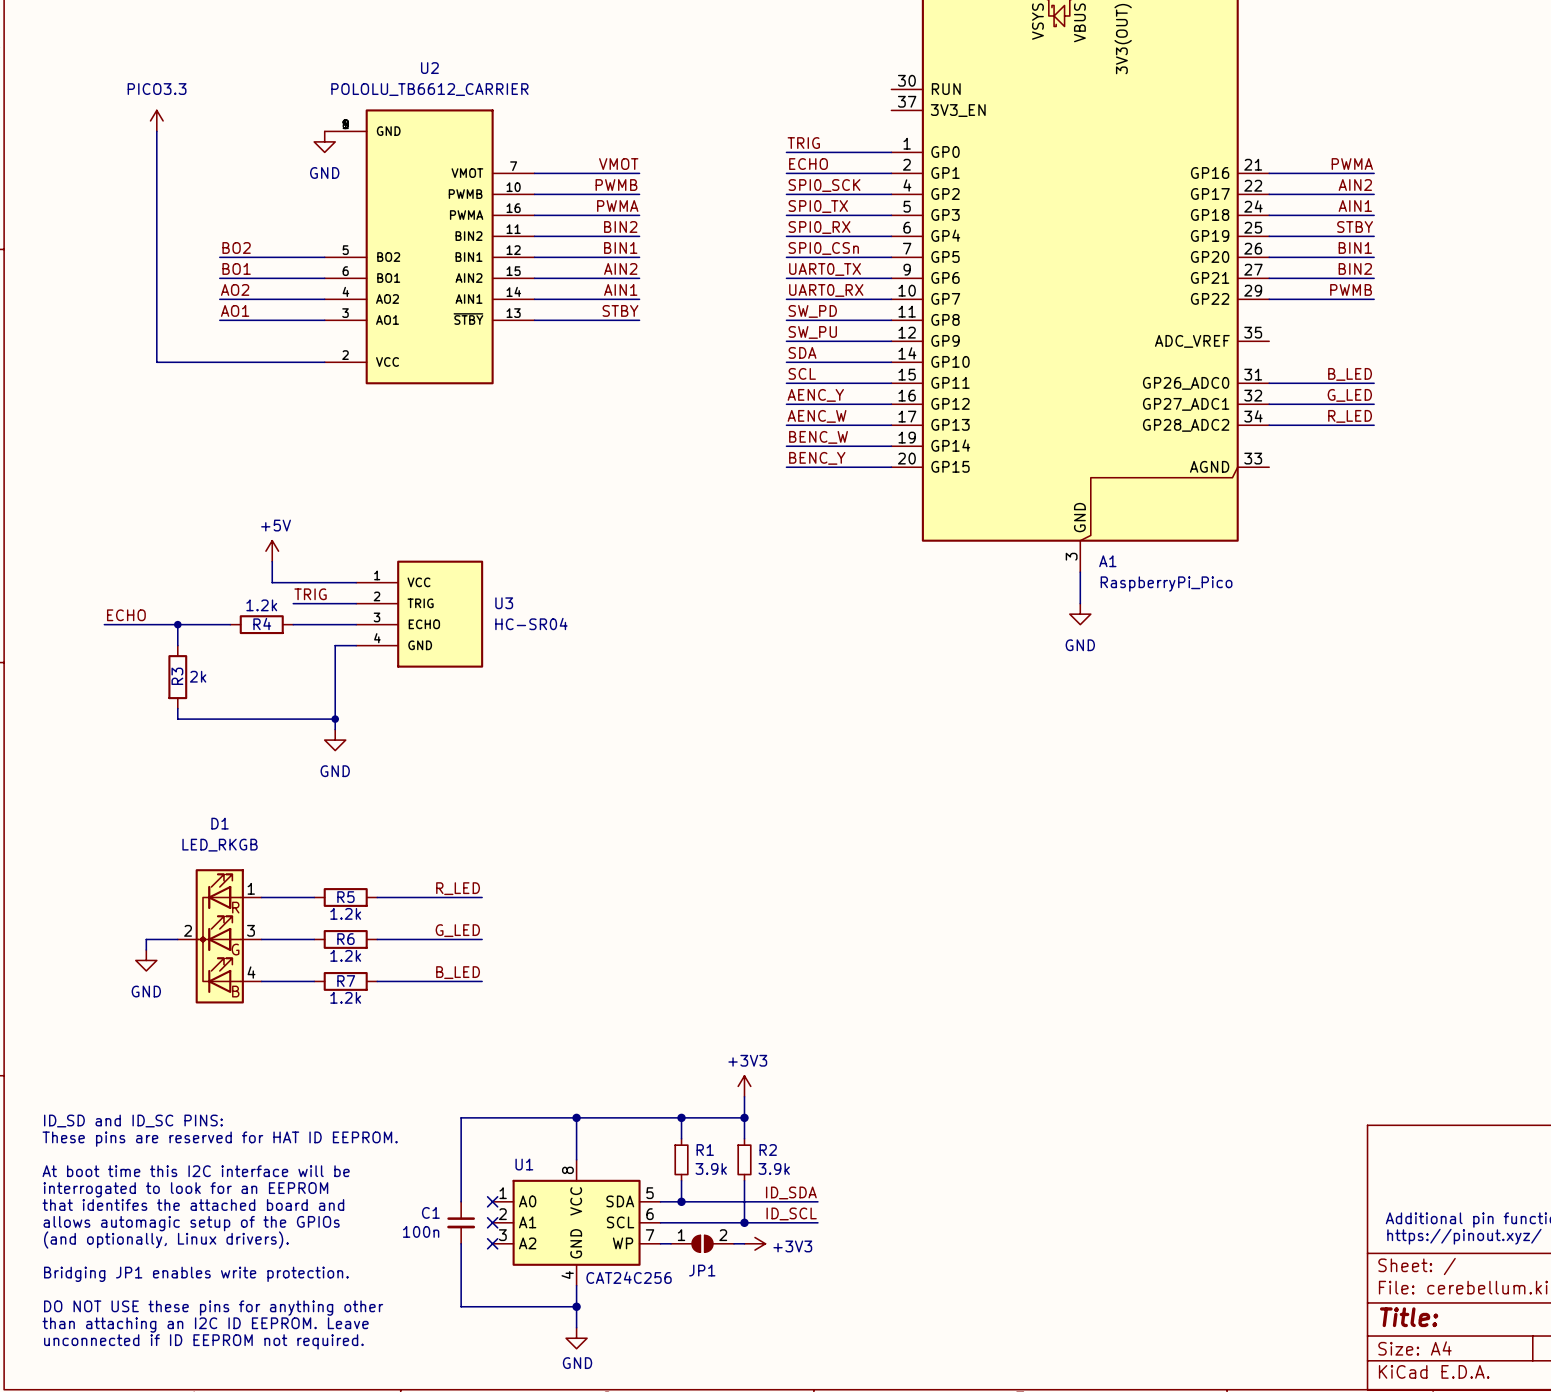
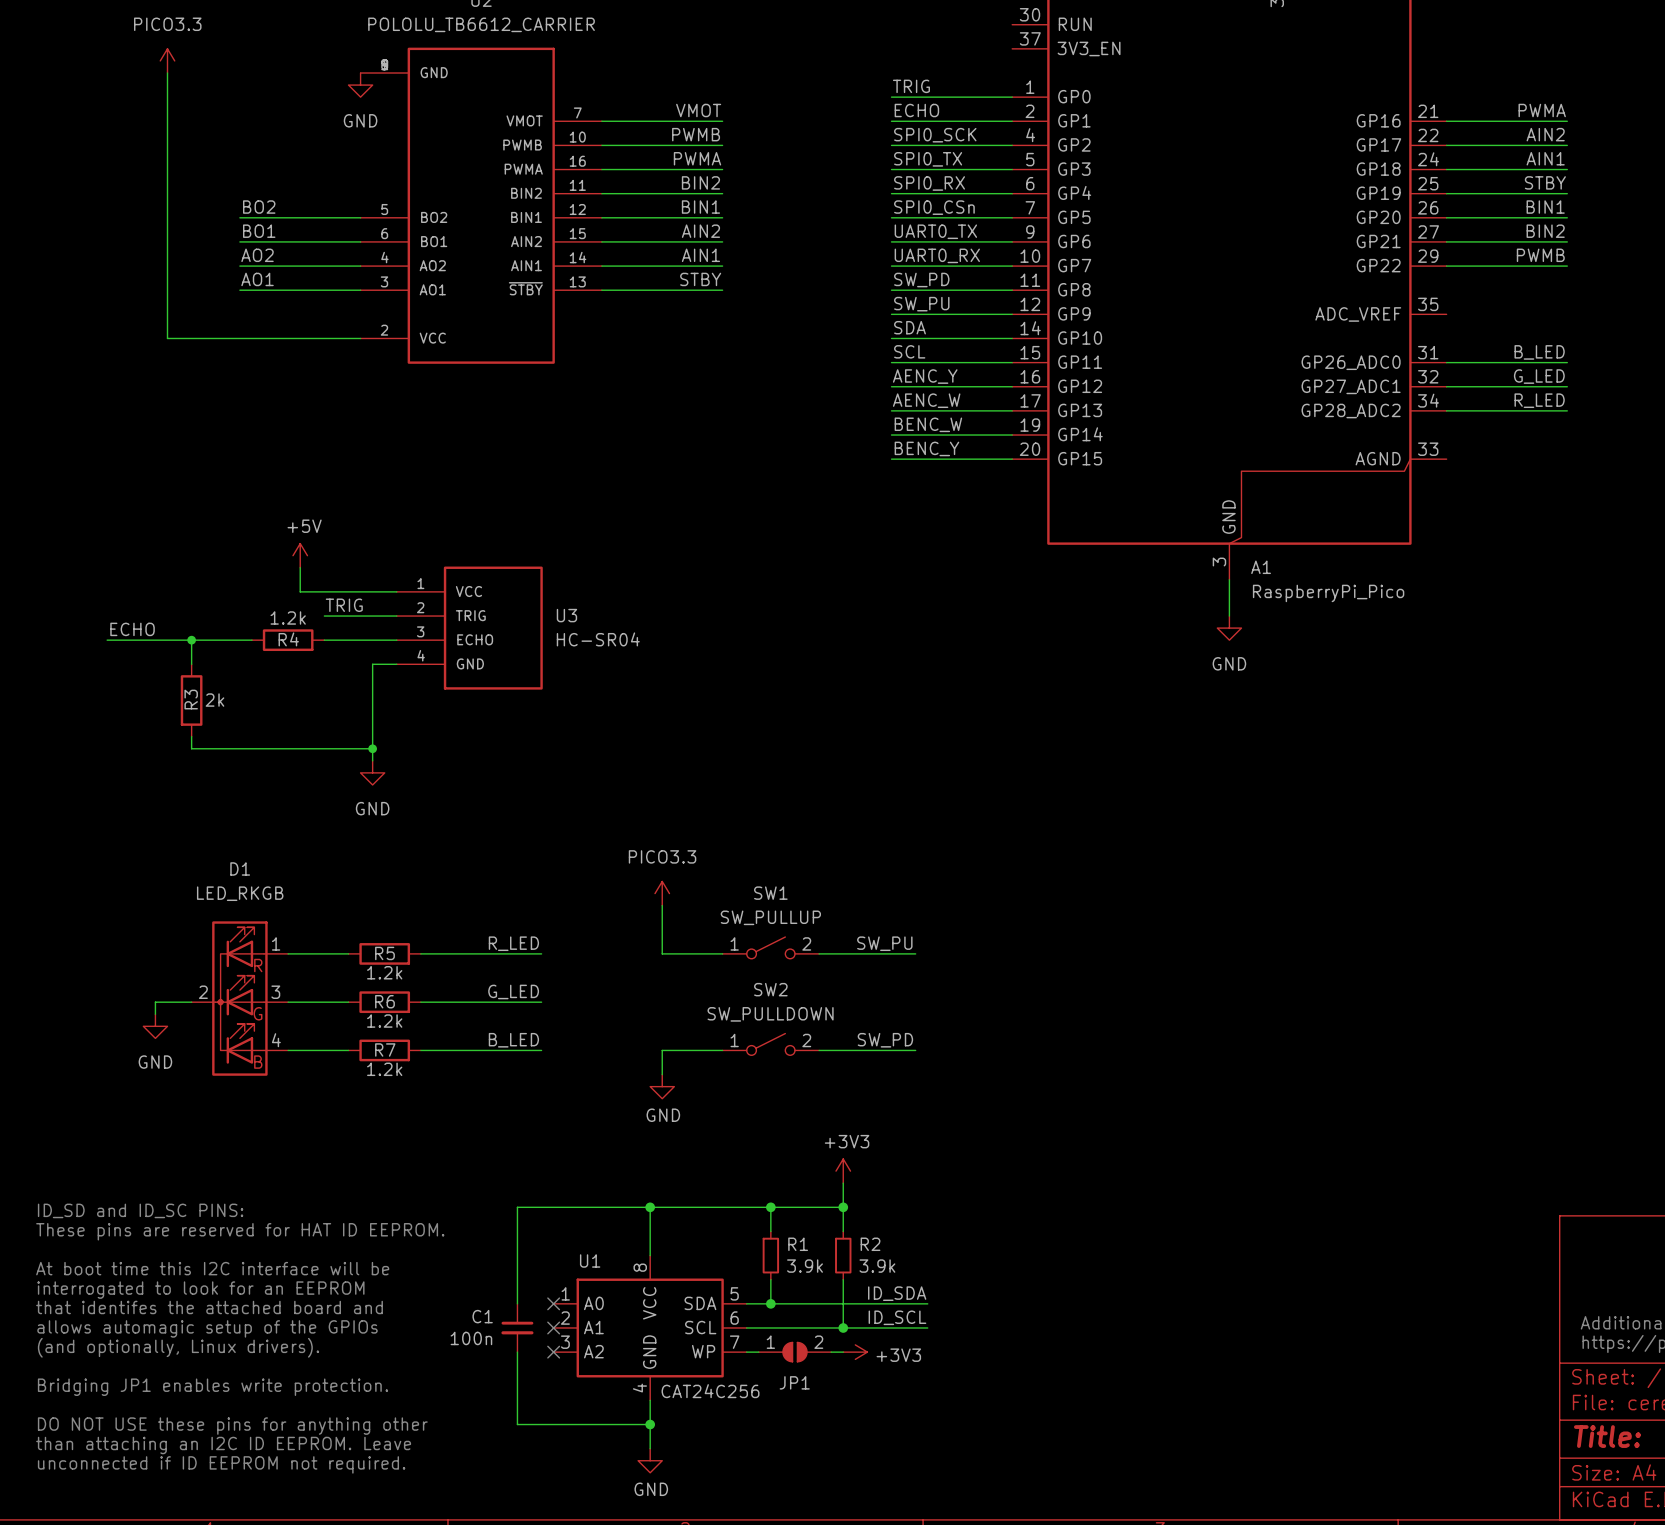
power symbol: none -> PICO3.3 (662, 893)
wire: none -> (662, 905) (662, 953) (722, 953)
label: none -> SW_PU (884, 943)
SW1: none -> SW_PULLUP (770, 947)
wire: none -> (819, 953) (915, 953)
label: none -> SW_PD (885, 1040)
SW2: none -> SW_PULLDOWN (770, 1044)
wire: none -> (722, 1050) (662, 1050) (662, 1074)
wire: none -> (819, 1050) (915, 1050)
power symbol: none -> GND (662, 1086)

